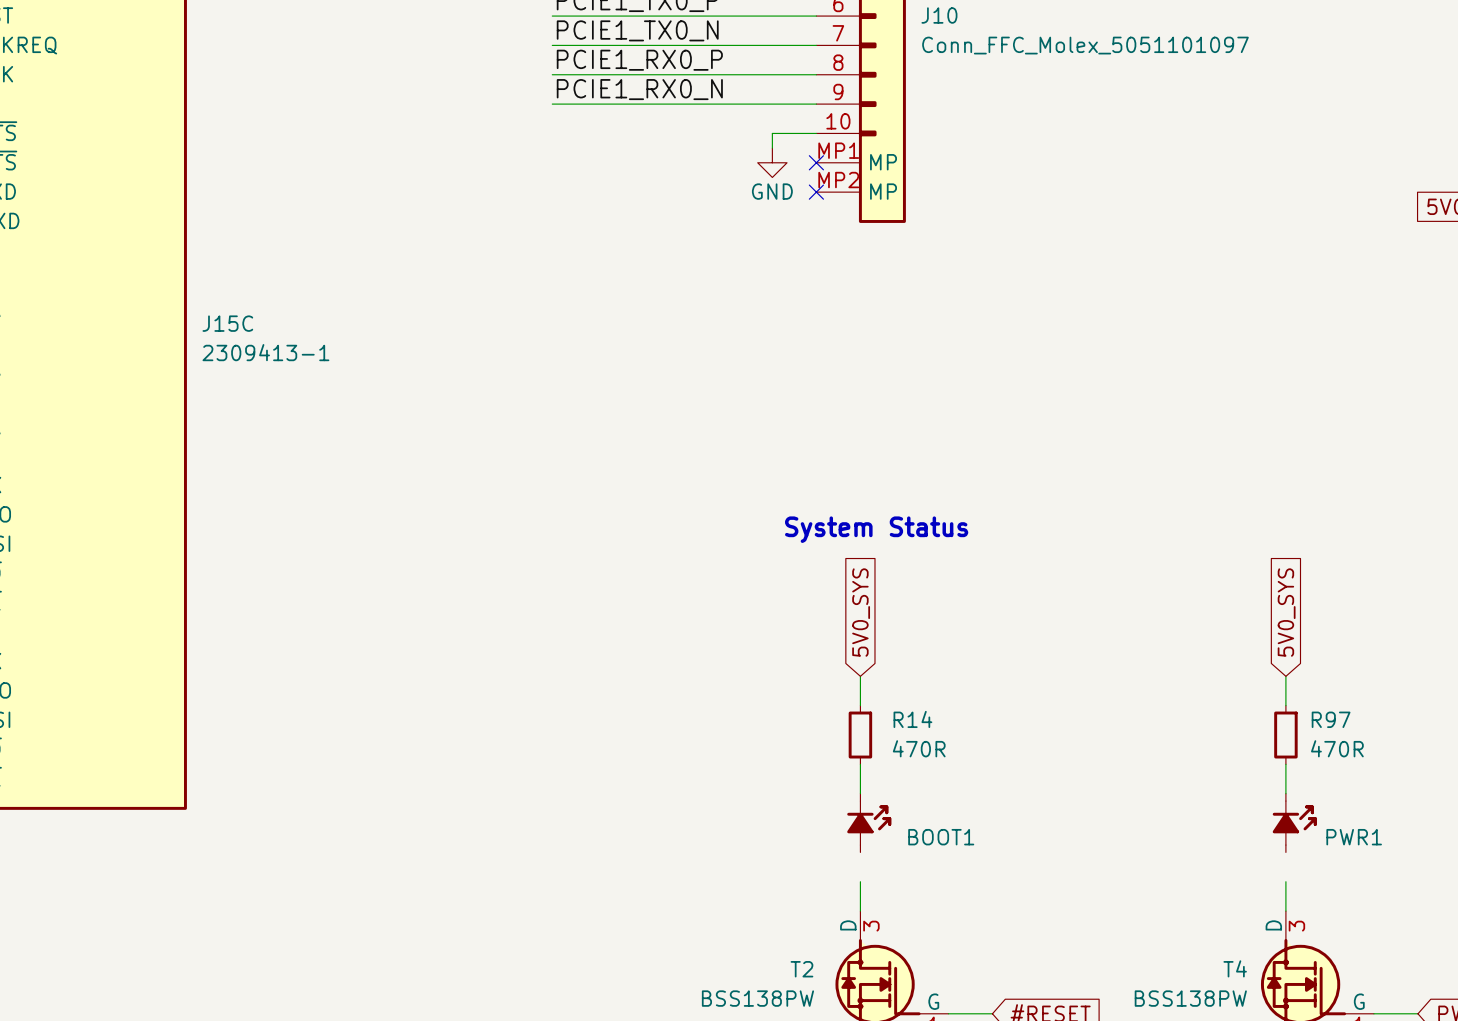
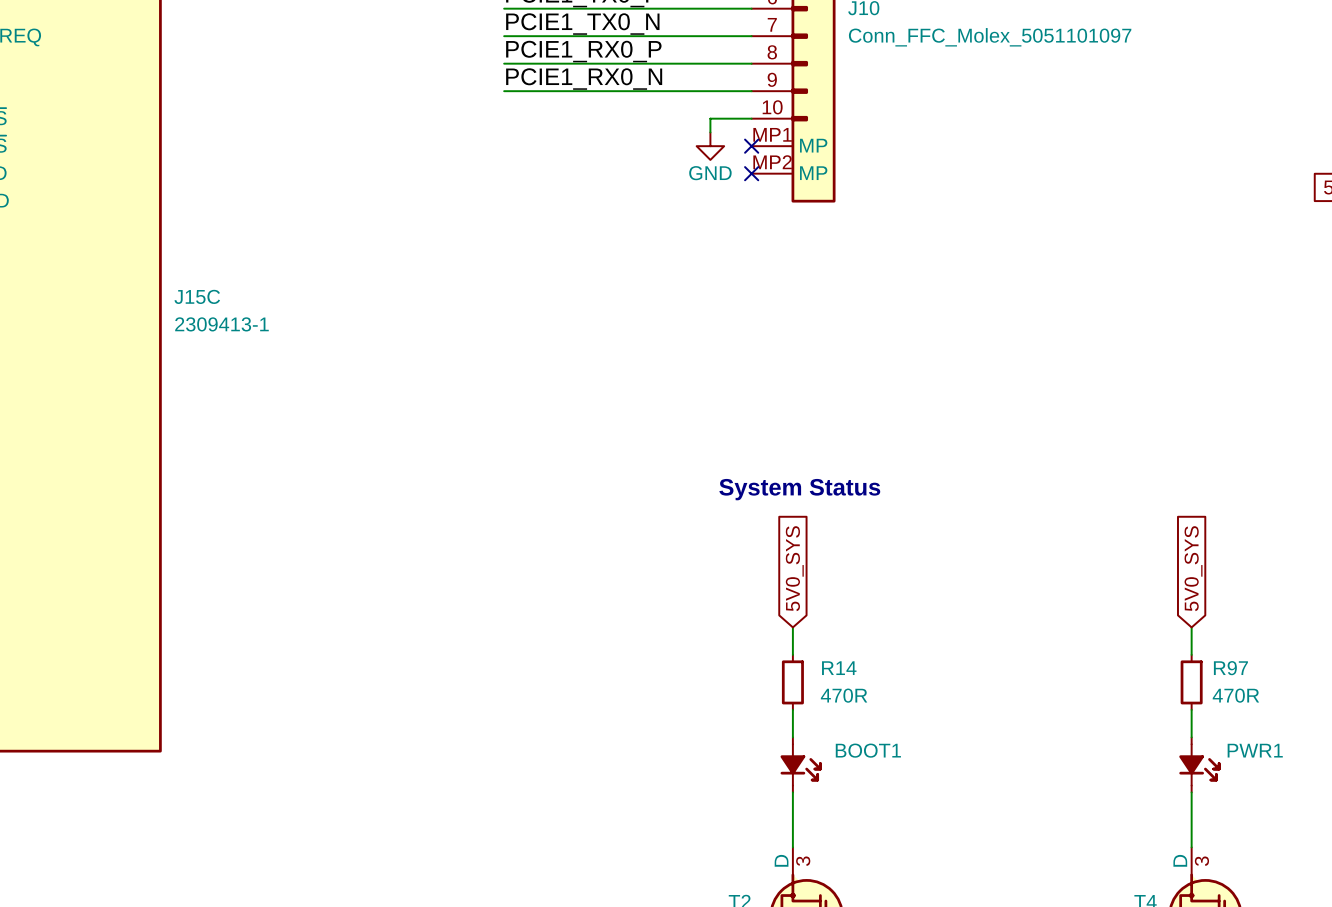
BOOT1 flip: as is (869, 823) -> up-down (801, 764)
PWR1 flip: as is (1294, 823) -> up-down (1199, 764)
wire: none -> (792, 792) (792, 819)
wire: none -> (1191, 792) (1191, 819)

